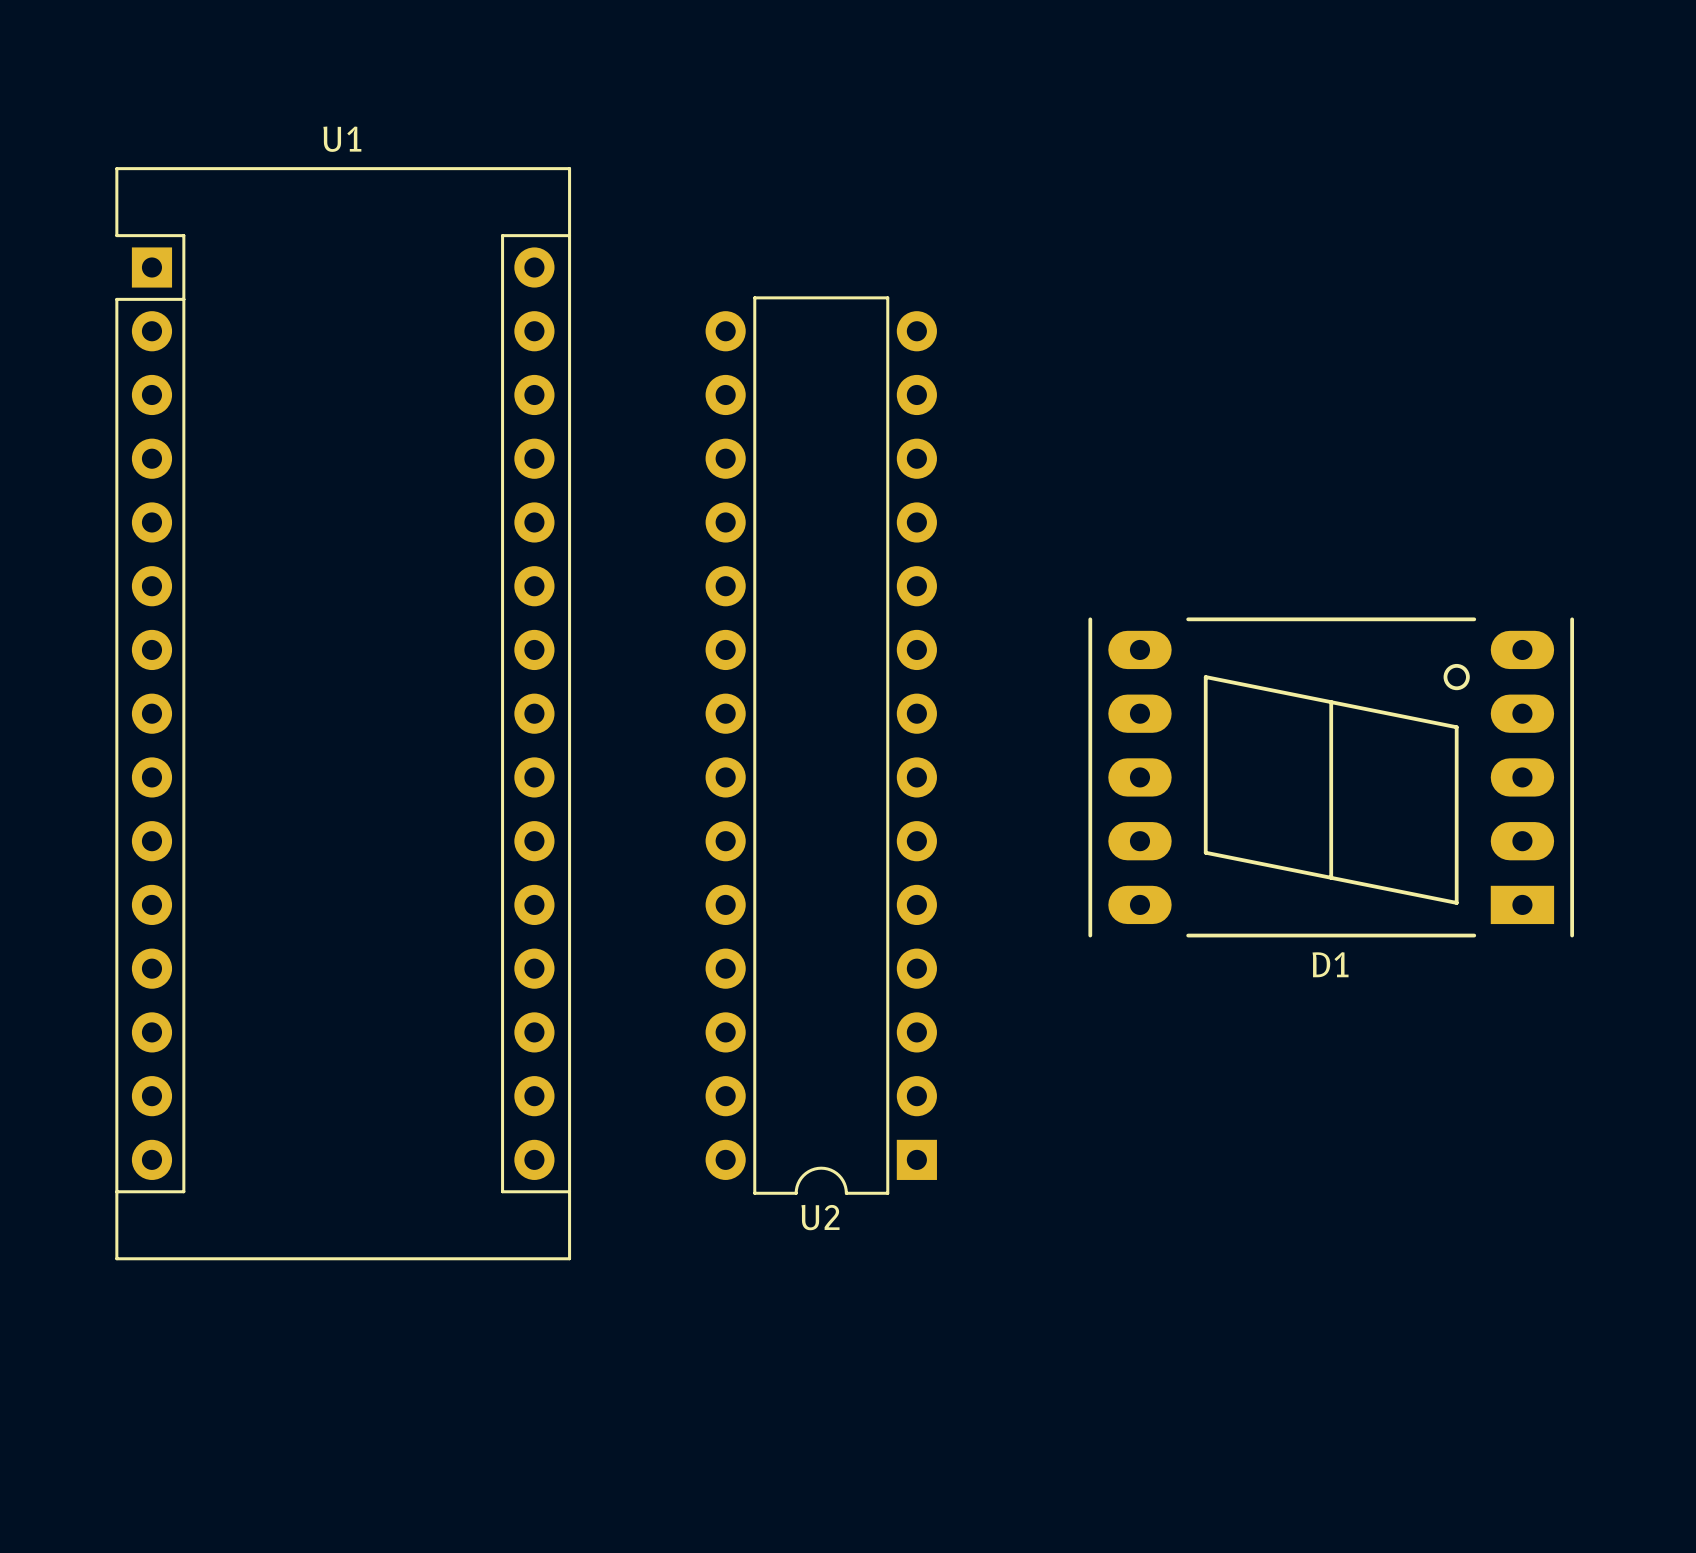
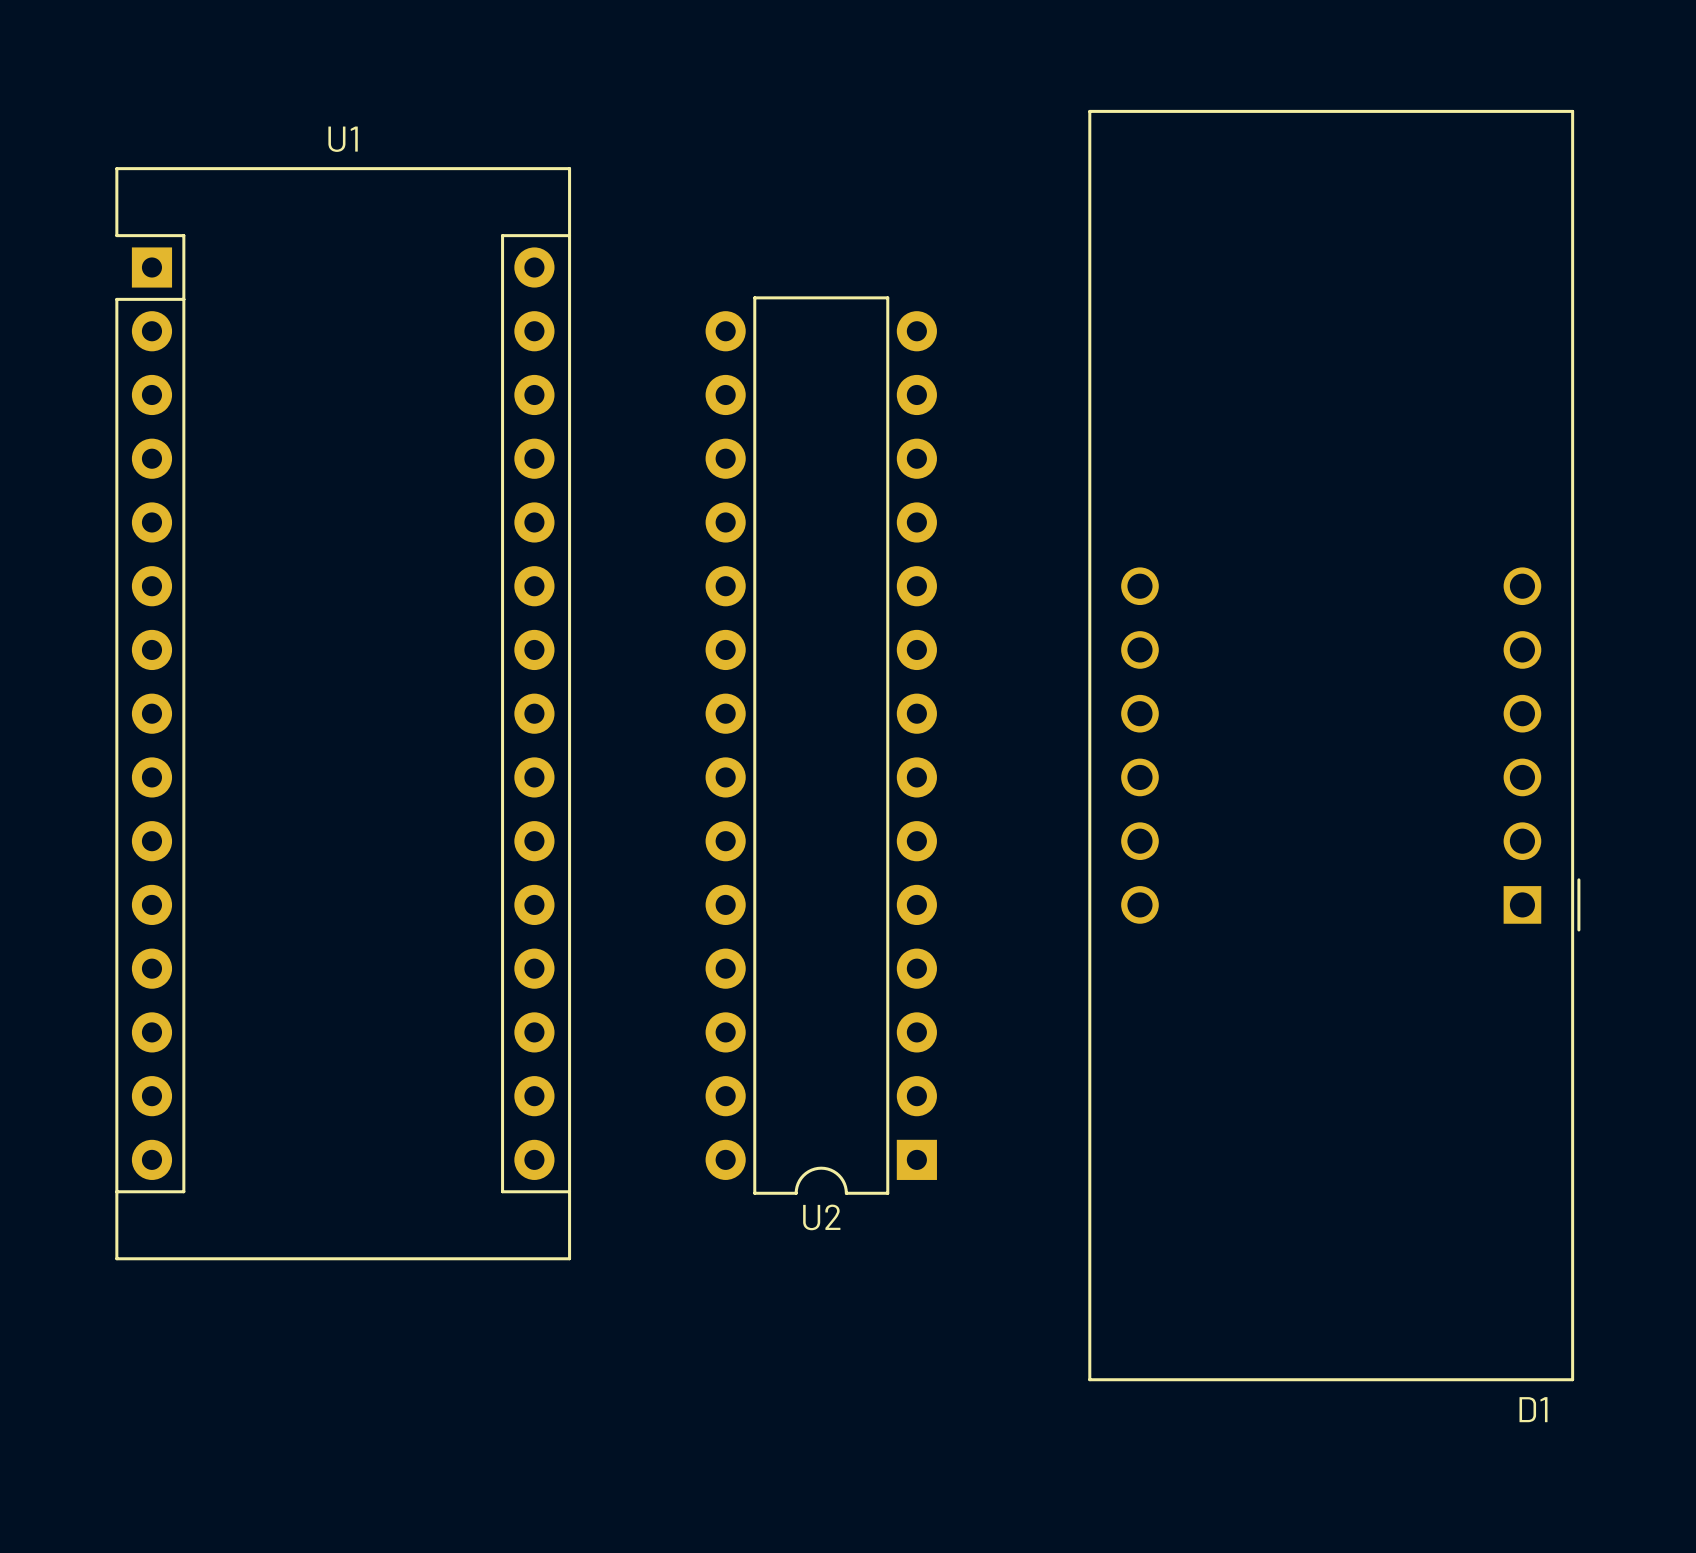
D1 footprint: [1088, 617, 1575, 938] -> [1088, 109, 1581, 1382]
D1 name position: D1 (1330, 964) -> D1 (1533, 1409)

